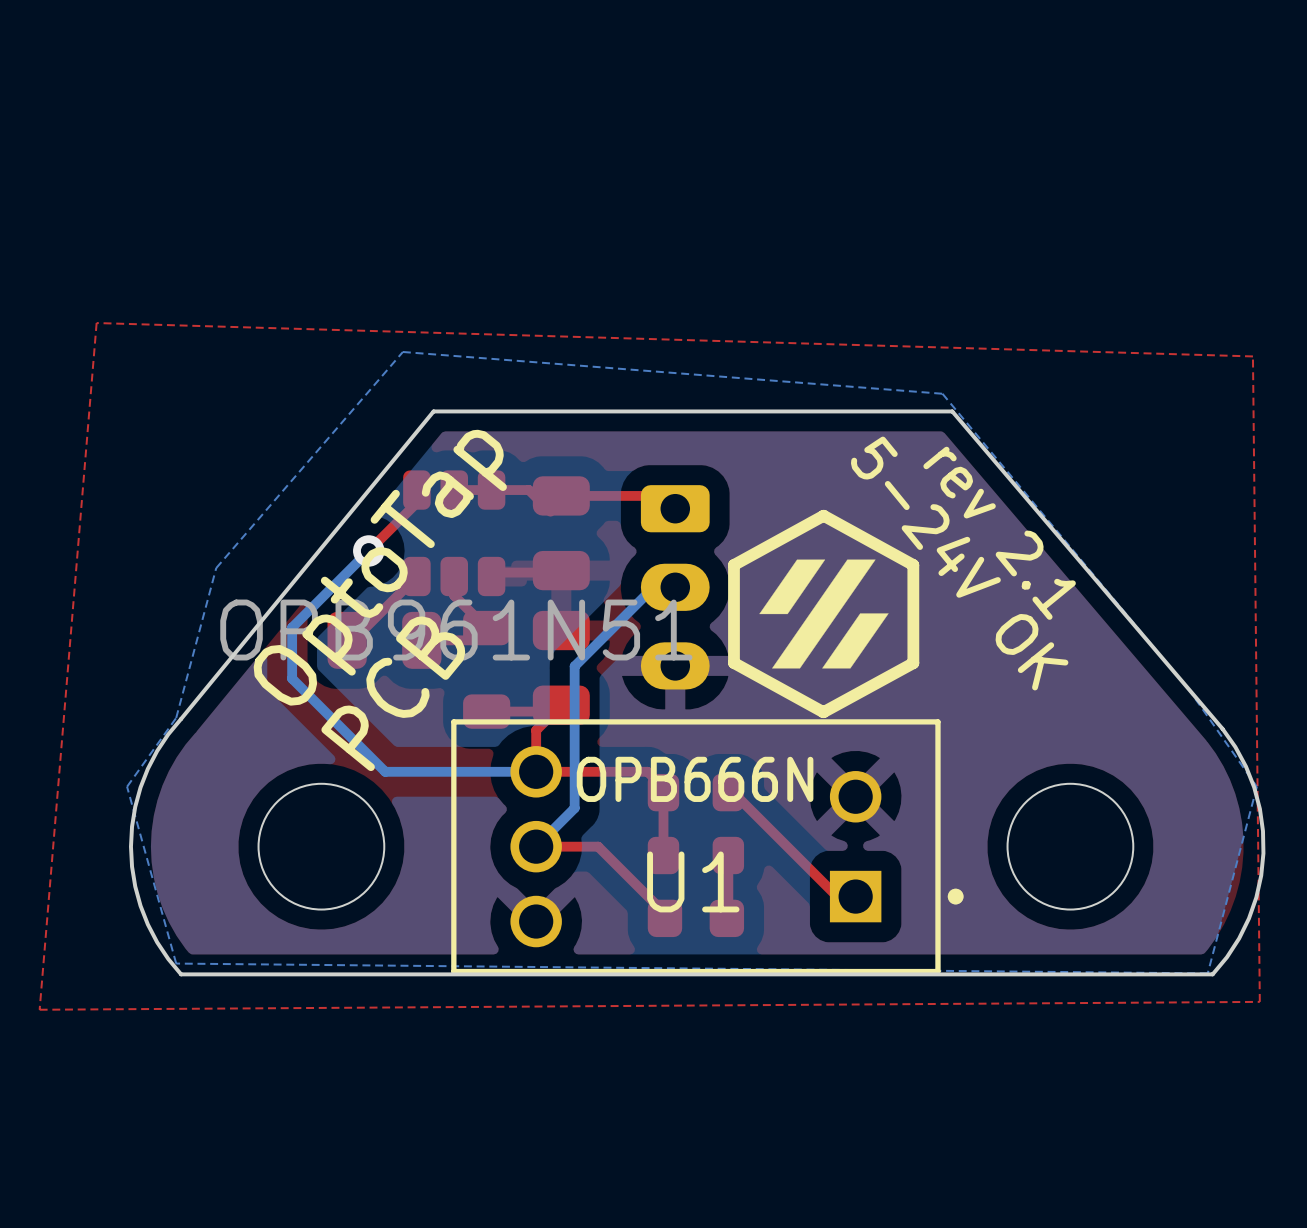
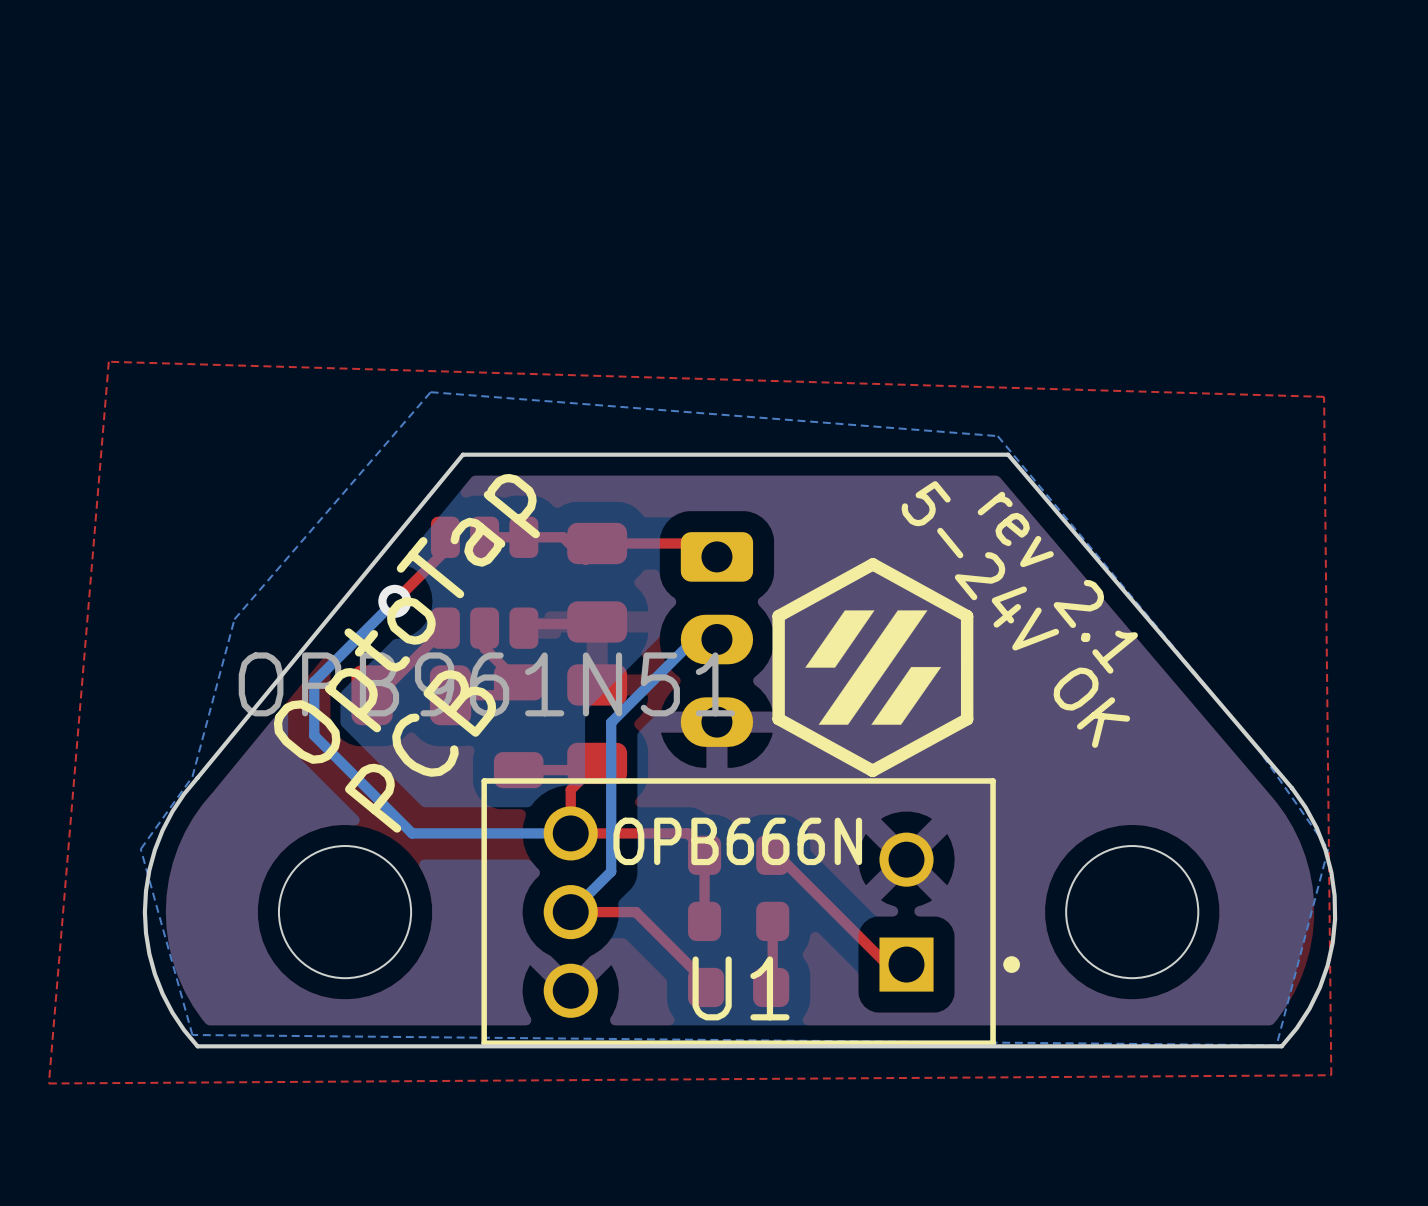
U1 name position: U1 (693, 881) -> U1 (741, 988)

